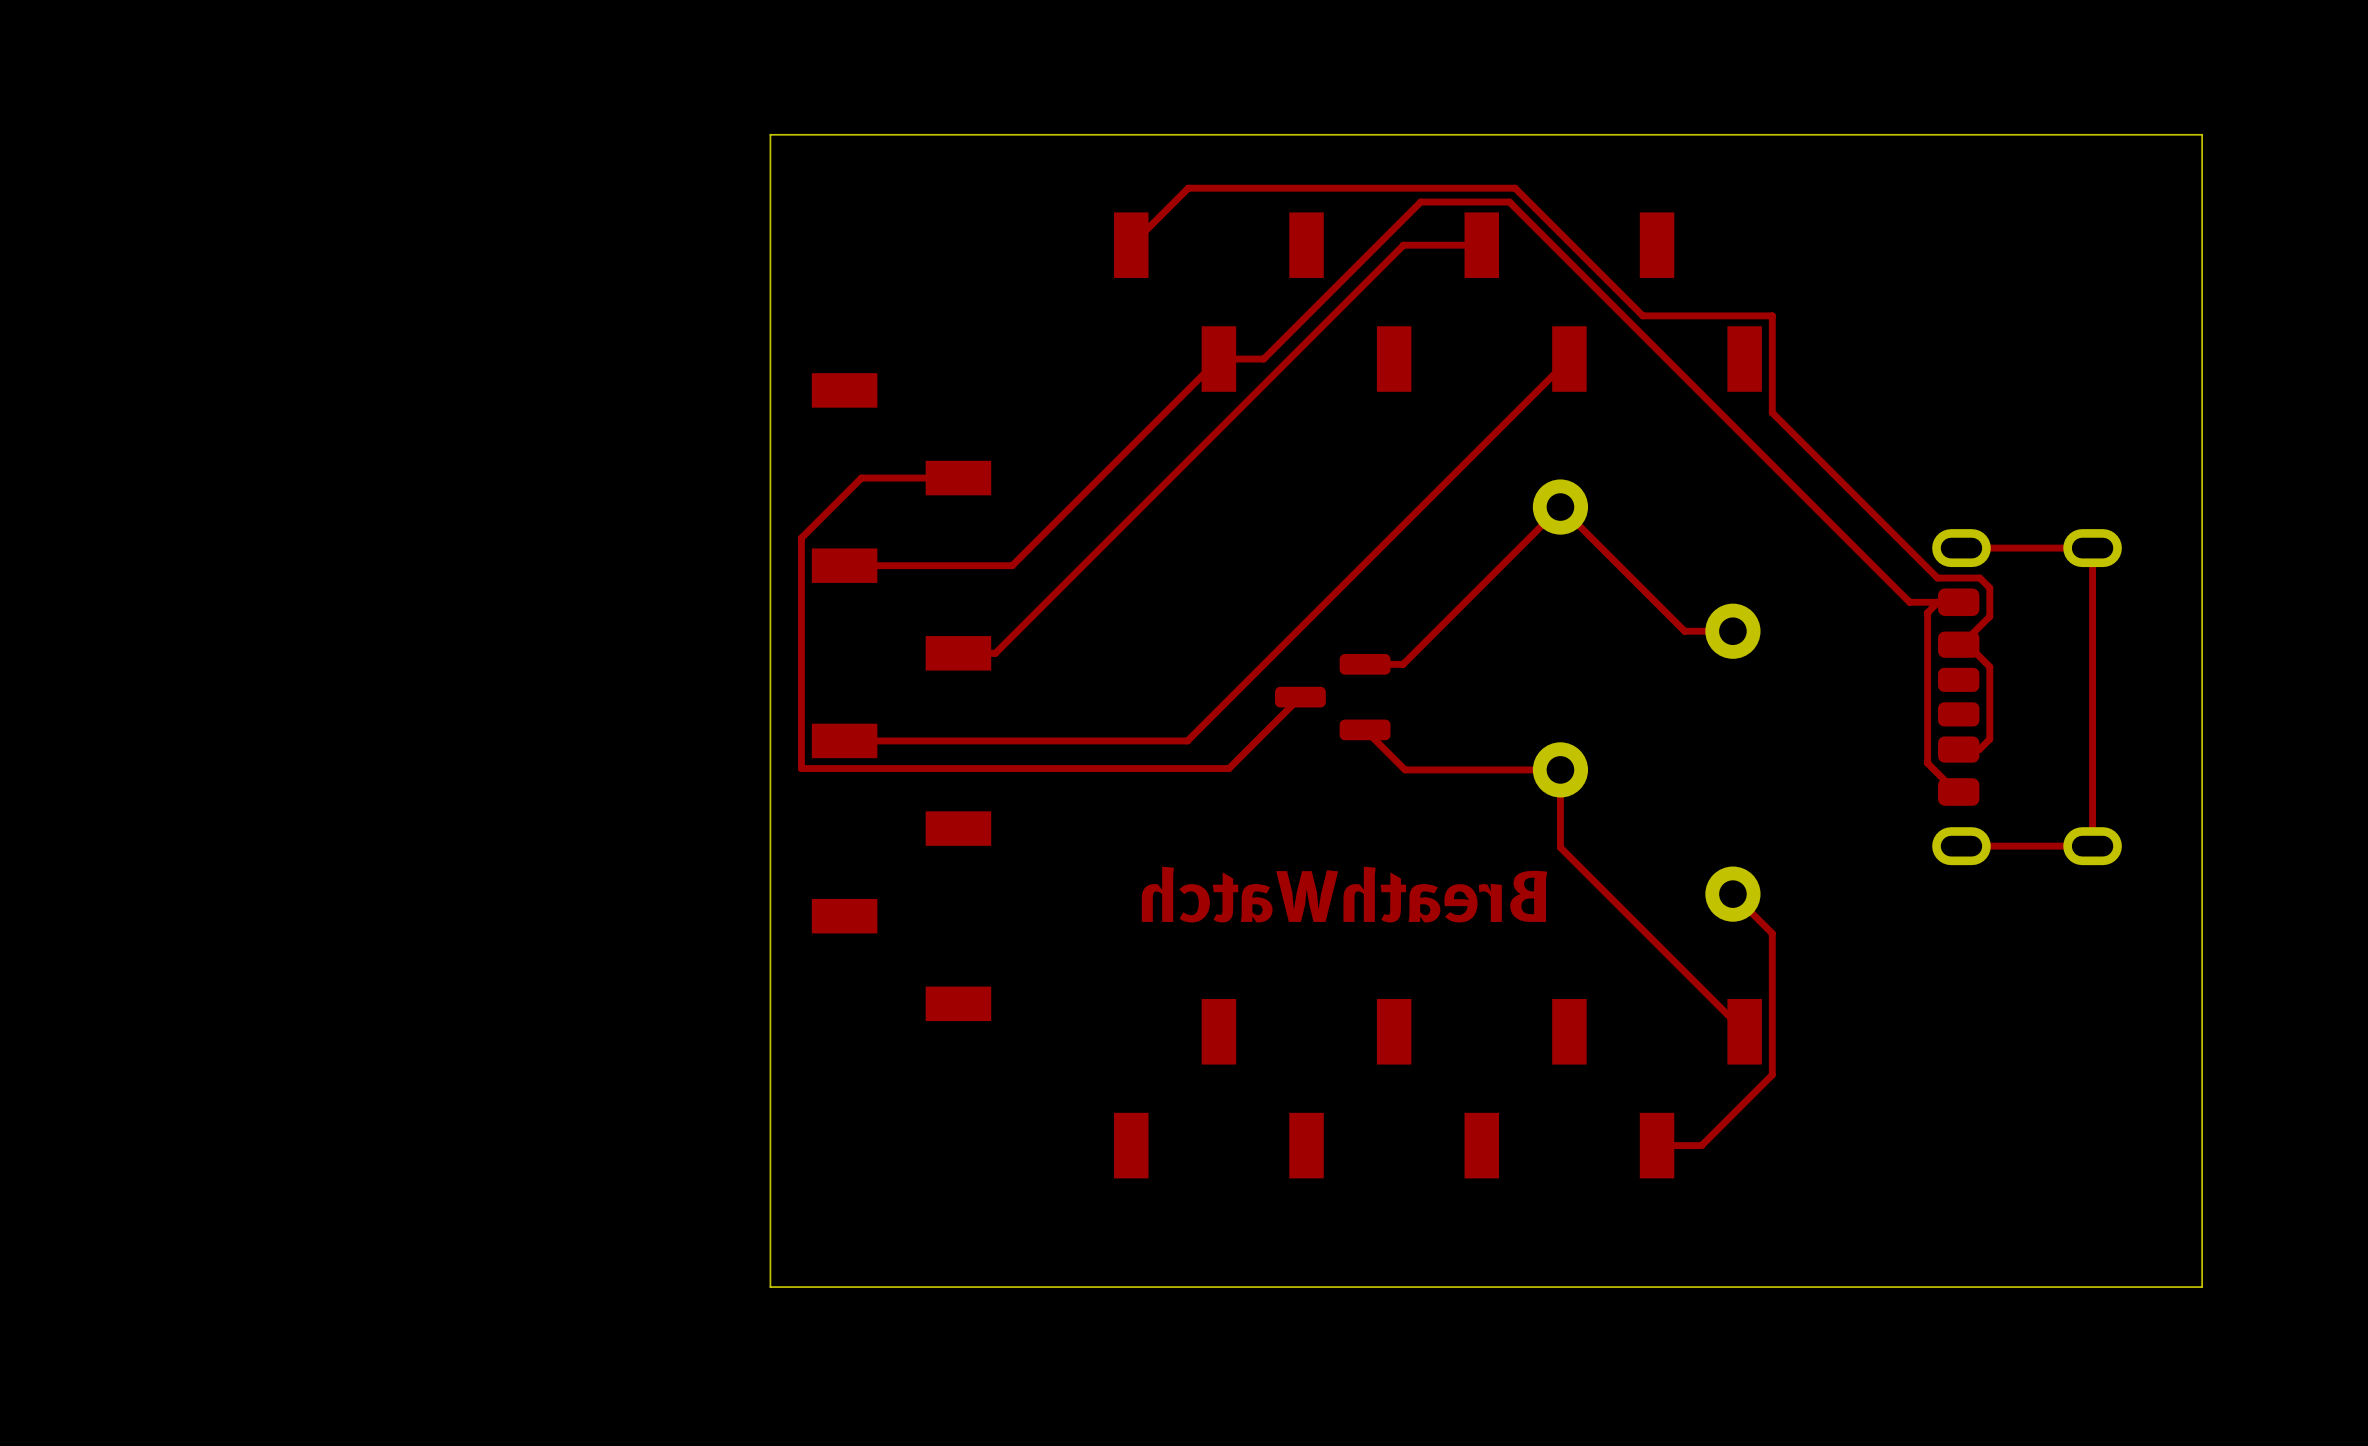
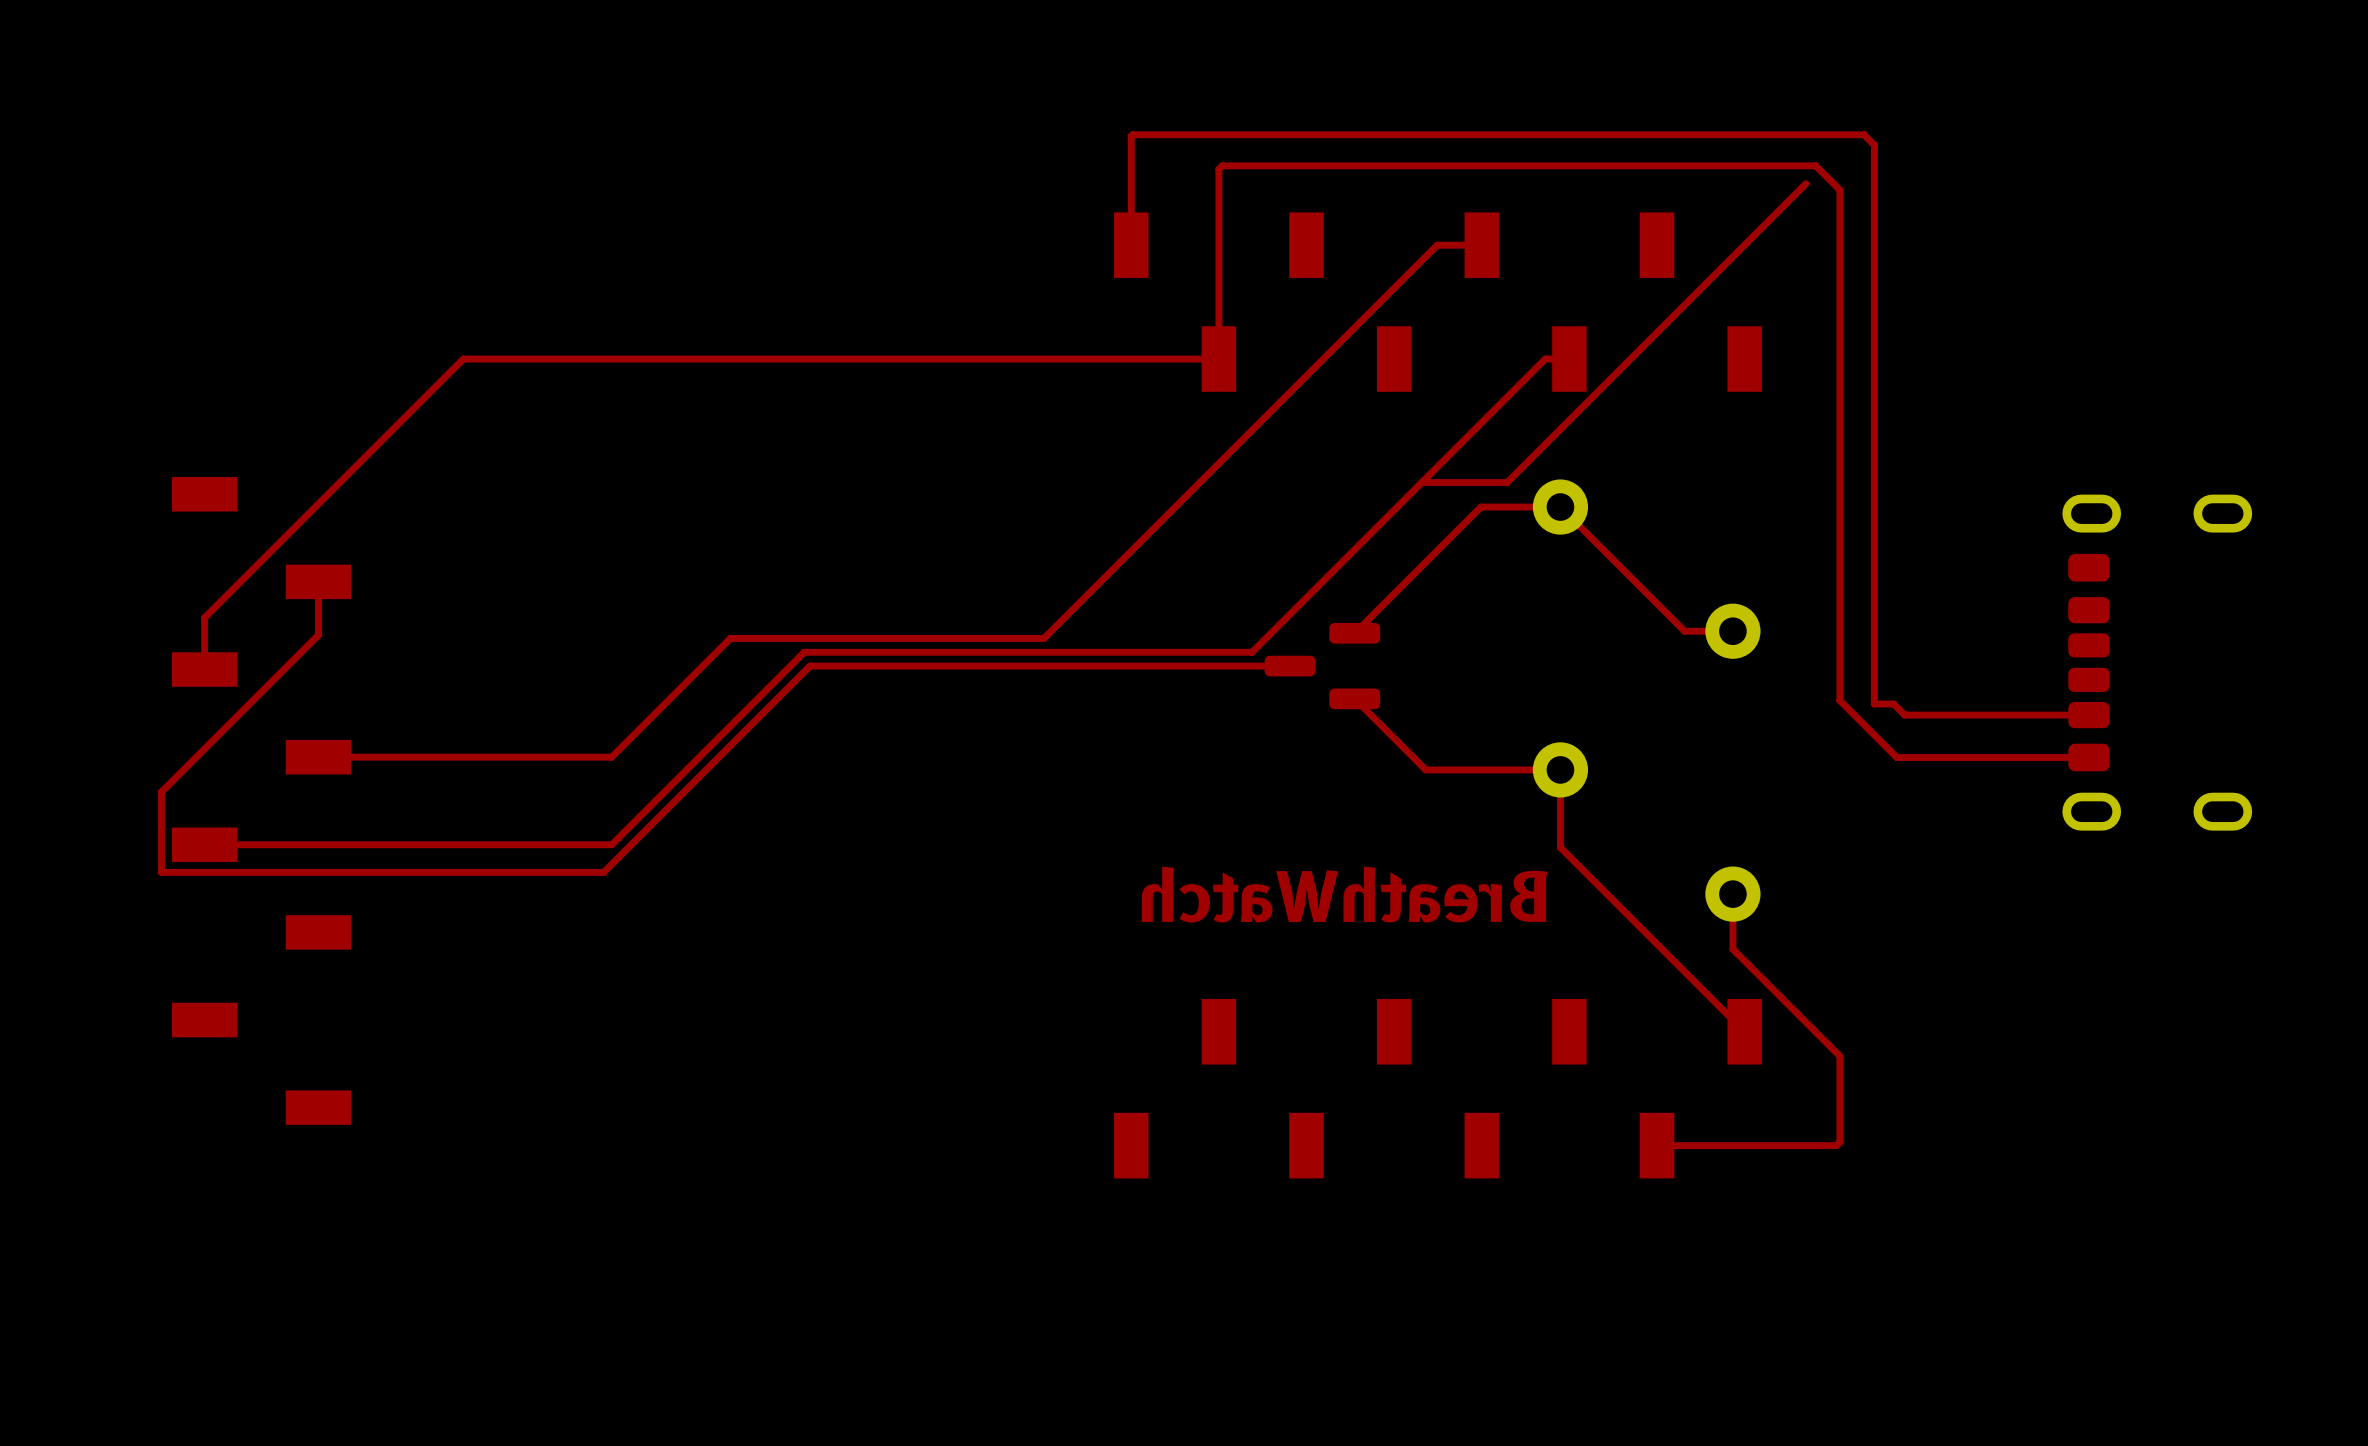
board edge: (2202, 134) (770, 134) (770, 1287) (2202, 1287) (2202, 134) -> none
top track: none -> (1805, 183) (1507, 482) (1421, 482)
top track: (1131, 245) (1188, 188) (1515, 188) (1642, 315) (1772, 315) (1772, 412) (1937, 578) (1979, 578) (1989, 588) (1989, 616) (1961, 644) -> (1131, 245) (1132, 134) (1864, 134) (1874, 145) (1874, 704) (1893, 704) (1904, 715) (2088, 715)
top track: (1437, 245) (1403, 245) (995, 653) (958, 653) -> (1437, 245) (1043, 638) (730, 638) (611, 757) (318, 757)
top track: (1569, 359) (1187, 740) (844, 740) -> (1569, 359) (1545, 359) (1252, 652) (804, 652) (611, 844) (204, 844)
top track: (958, 478) (861, 478) (801, 538) (801, 768) (1228, 768) (1300, 697) -> none
top track: (1560, 507) (1403, 664) (1365, 664) -> (1560, 507) (1481, 507) (1354, 633)
top track: (1961, 548) (2092, 548) (2092, 846) (1961, 846) -> none
top track: (844, 565) (1012, 565) (1218, 359) (1263, 359) (1420, 202) (1509, 202) (1909, 602) (1958, 602) -> none
top track: none -> (318, 581) (318, 635) (161, 792) (161, 872) (603, 872) (809, 666) (1290, 666)
top track: (1938, 602) (1927, 612) (1927, 763) (1956, 791) (1958, 791) -> none
top track: (1958, 644) (1967, 644) (1989, 666) (1989, 739) (1979, 749) (1958, 749) -> none
top track: none -> (204, 669) (204, 617) (463, 359) (1218, 359) (1218, 169) (1222, 165) (1815, 165) (1839, 189) (1839, 700) (1896, 757) (2088, 757)
part position: (901, 697) -> (261, 800)
part position: (1332, 697) -> (1322, 666)
part position: (2027, 697) -> (2157, 662)
top track: (1365, 729) (1405, 769) (1425, 769) -> (1354, 698) (1425, 769)
top track: (1732, 894) (1772, 933) (1772, 1074) (1701, 1145) -> (1732, 894) (1732, 949) (1839, 1056) (1839, 1142) (1836, 1145) (1701, 1145)

